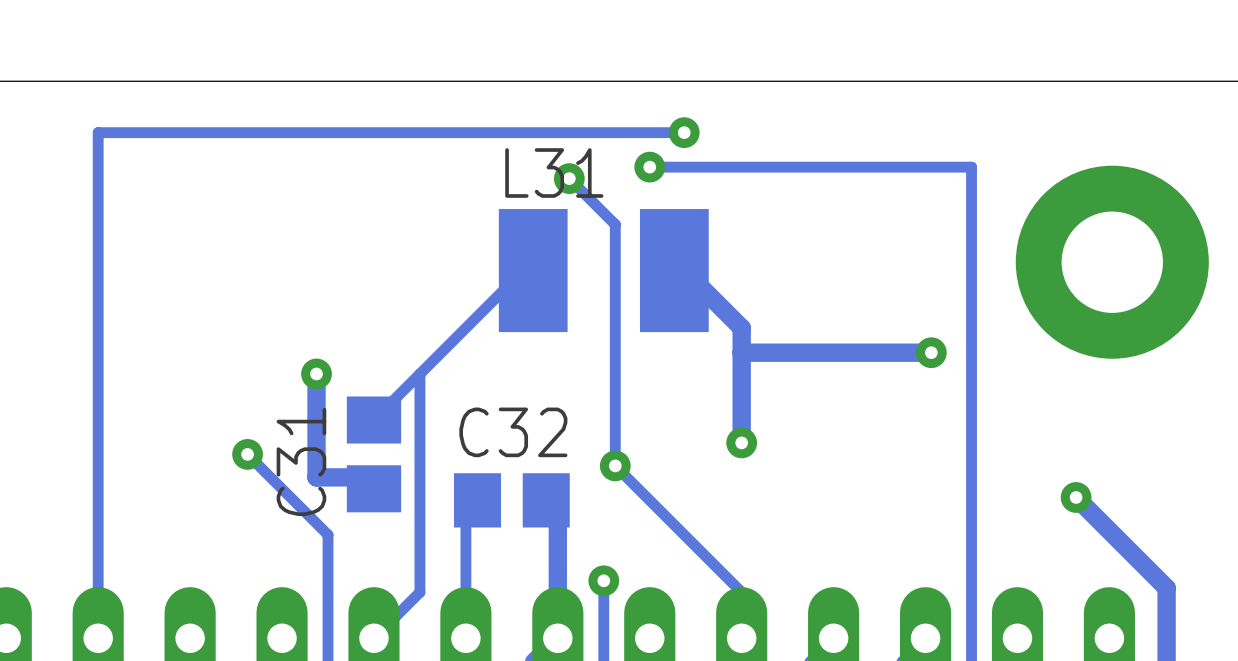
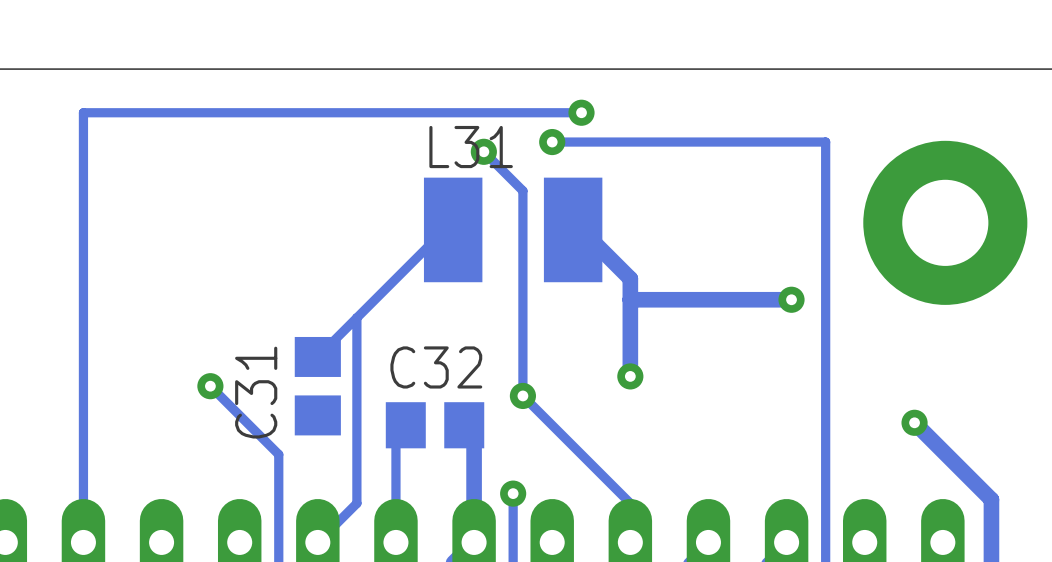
track: (316, 373) (316, 477) (373, 477) (373, 488) -> none
via: (316, 373) -> none

